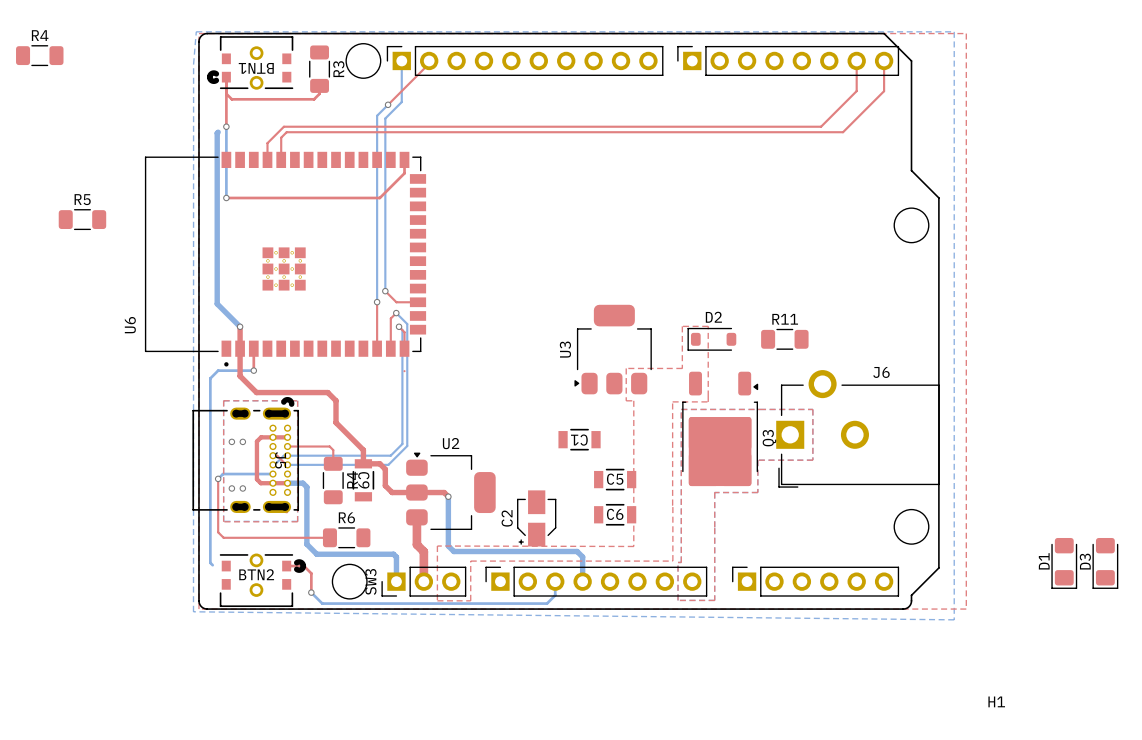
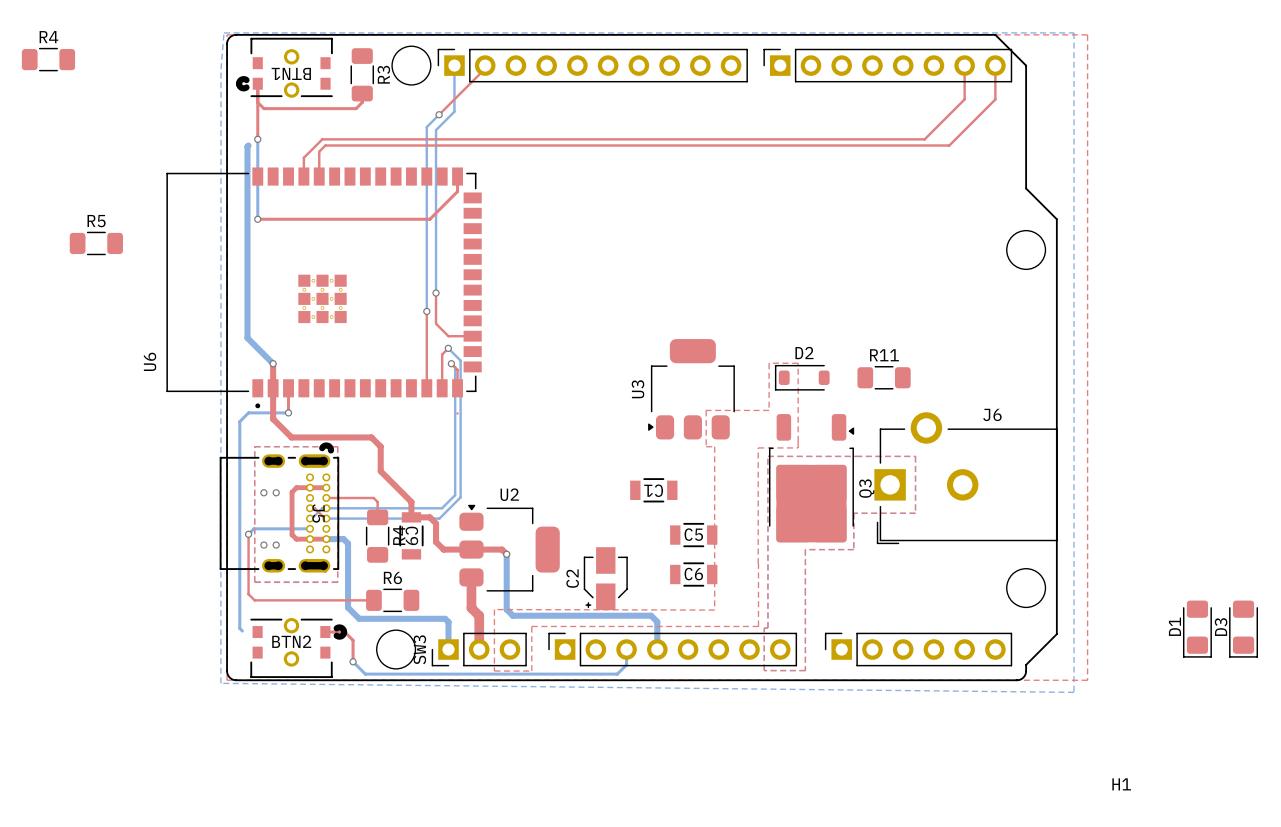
top track: none -> (436, 293) (436, 323)
bottom track: (385, 263) (385, 291) -> none
via: none -> (436, 293)
top track: none -> (426, 311) (426, 336)
bottom track: (377, 280) (377, 302) -> none
via: none -> (426, 311)
via: (385, 291) -> none
via: (377, 302) -> none

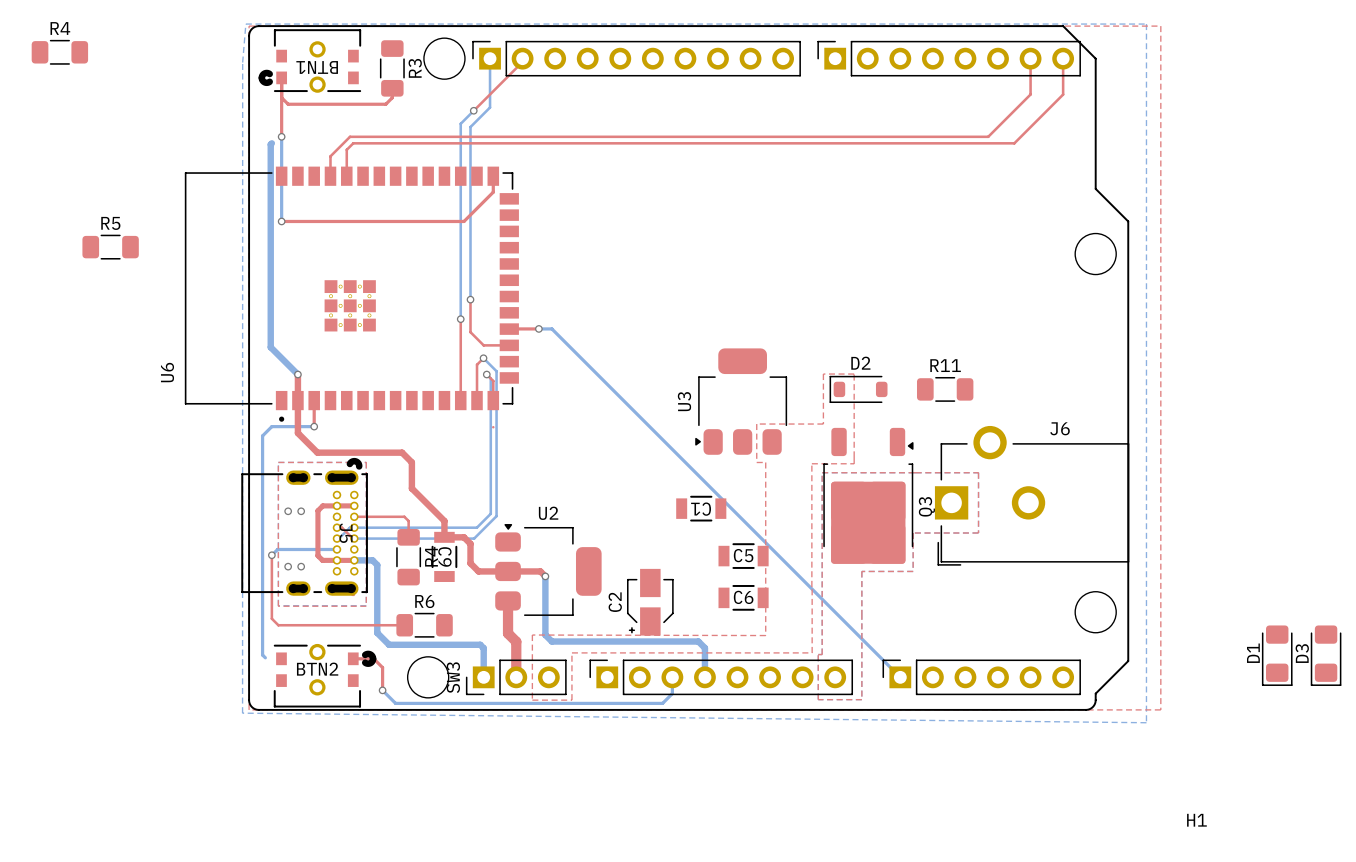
top track: none -> (509, 328) (538, 328)
bottom track: none -> (538, 328) (551, 328) (900, 677)
via: none -> (538, 328)

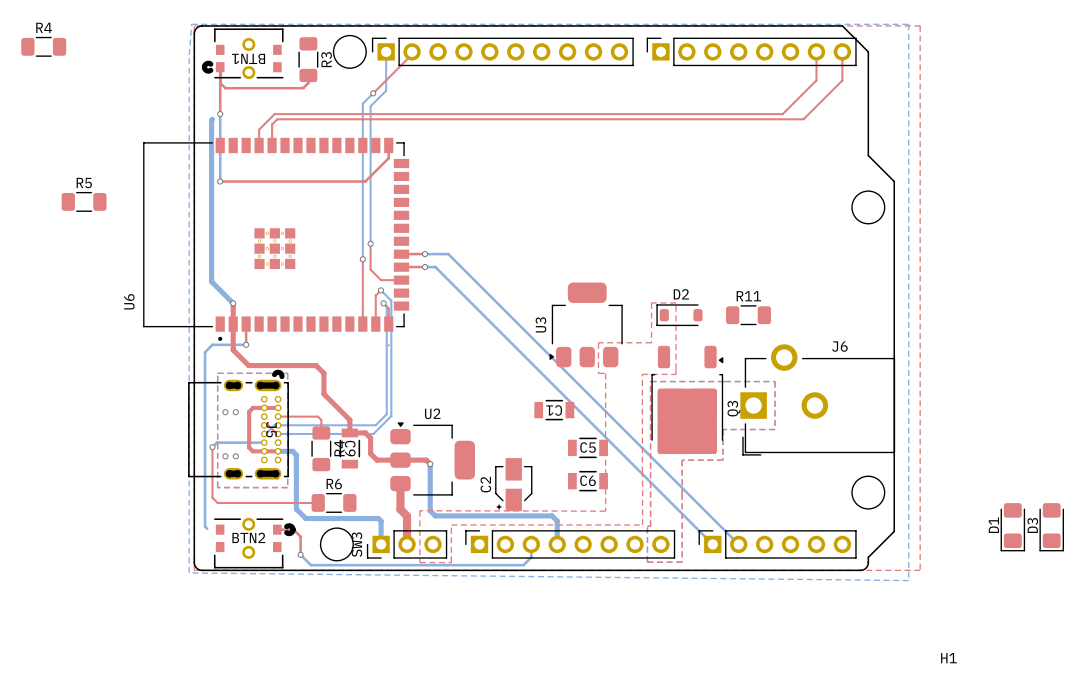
top track: none -> (401, 254) (425, 254)
bottom track: none -> (425, 254) (448, 254) (738, 544)
via: none -> (425, 254)

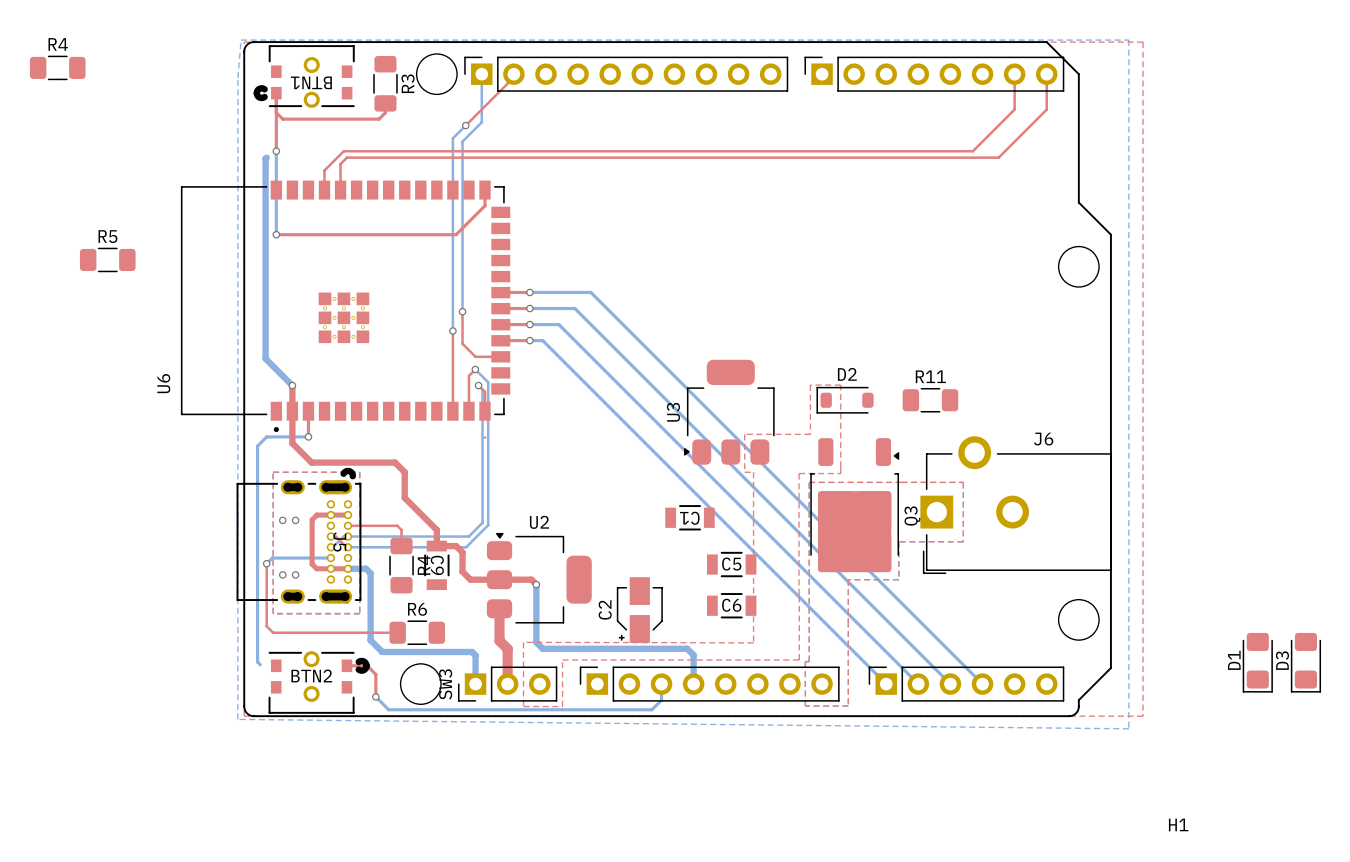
top track: none -> (500, 292) (529, 292)
bottom track: none -> (529, 292) (590, 292) (982, 684)
via: none -> (529, 292)
top track: none -> (500, 308) (529, 308)
bottom track: none -> (529, 308) (574, 308) (950, 684)
via: none -> (529, 308)

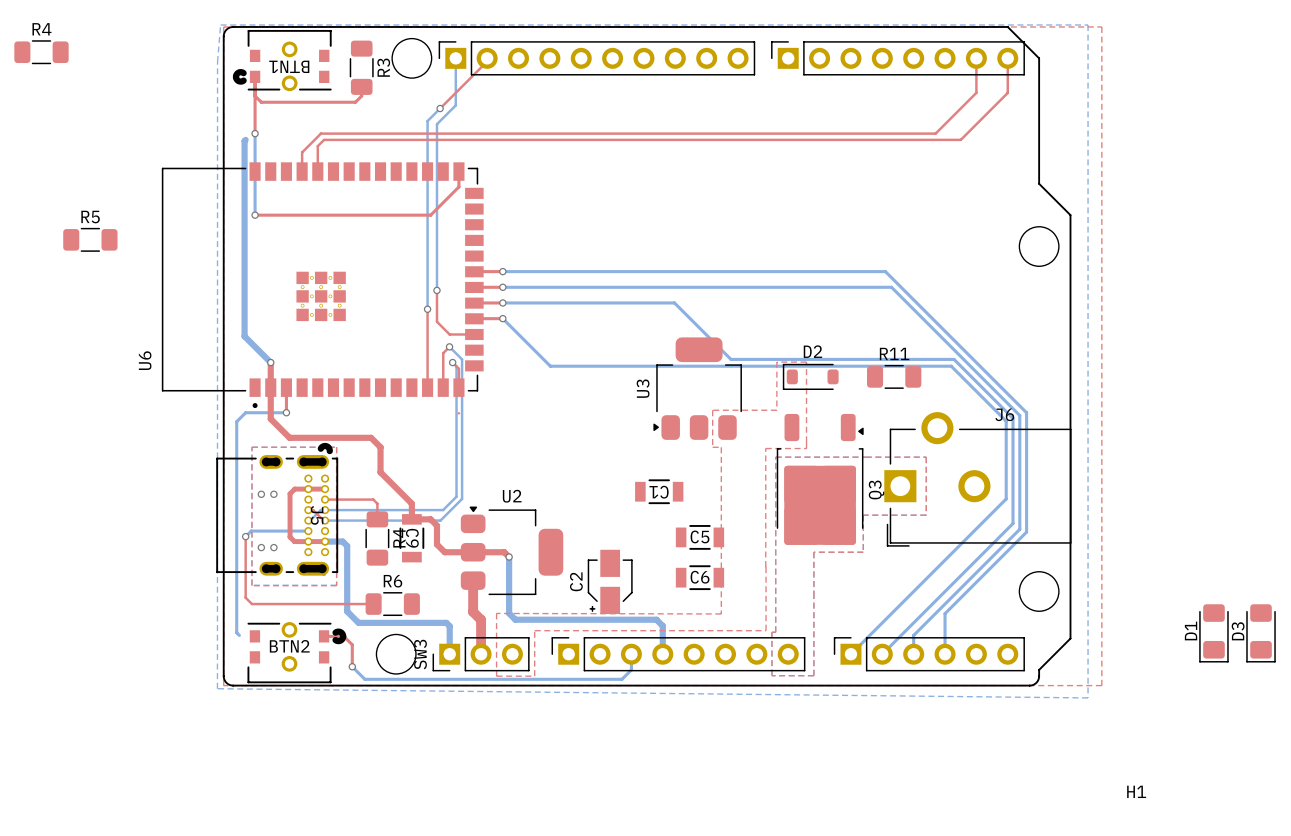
bottom track: (590, 292) (982, 684) -> (562, 271) (885, 271) (1026, 412) (1026, 532) (945, 613) (945, 654)
bottom track: (574, 308) (950, 684) -> (546, 287) (891, 287) (1019, 415) (1019, 529) (913, 635) (913, 654)
bottom track: (558, 324) (918, 684) -> (531, 302) (674, 302) (730, 359) (954, 359) (1013, 418) (1013, 523) (882, 654)
bottom track: (529, 340) (542, 340) (886, 684) -> (502, 318) (550, 366) (951, 366) (1006, 421) (1006, 498) (850, 654)

